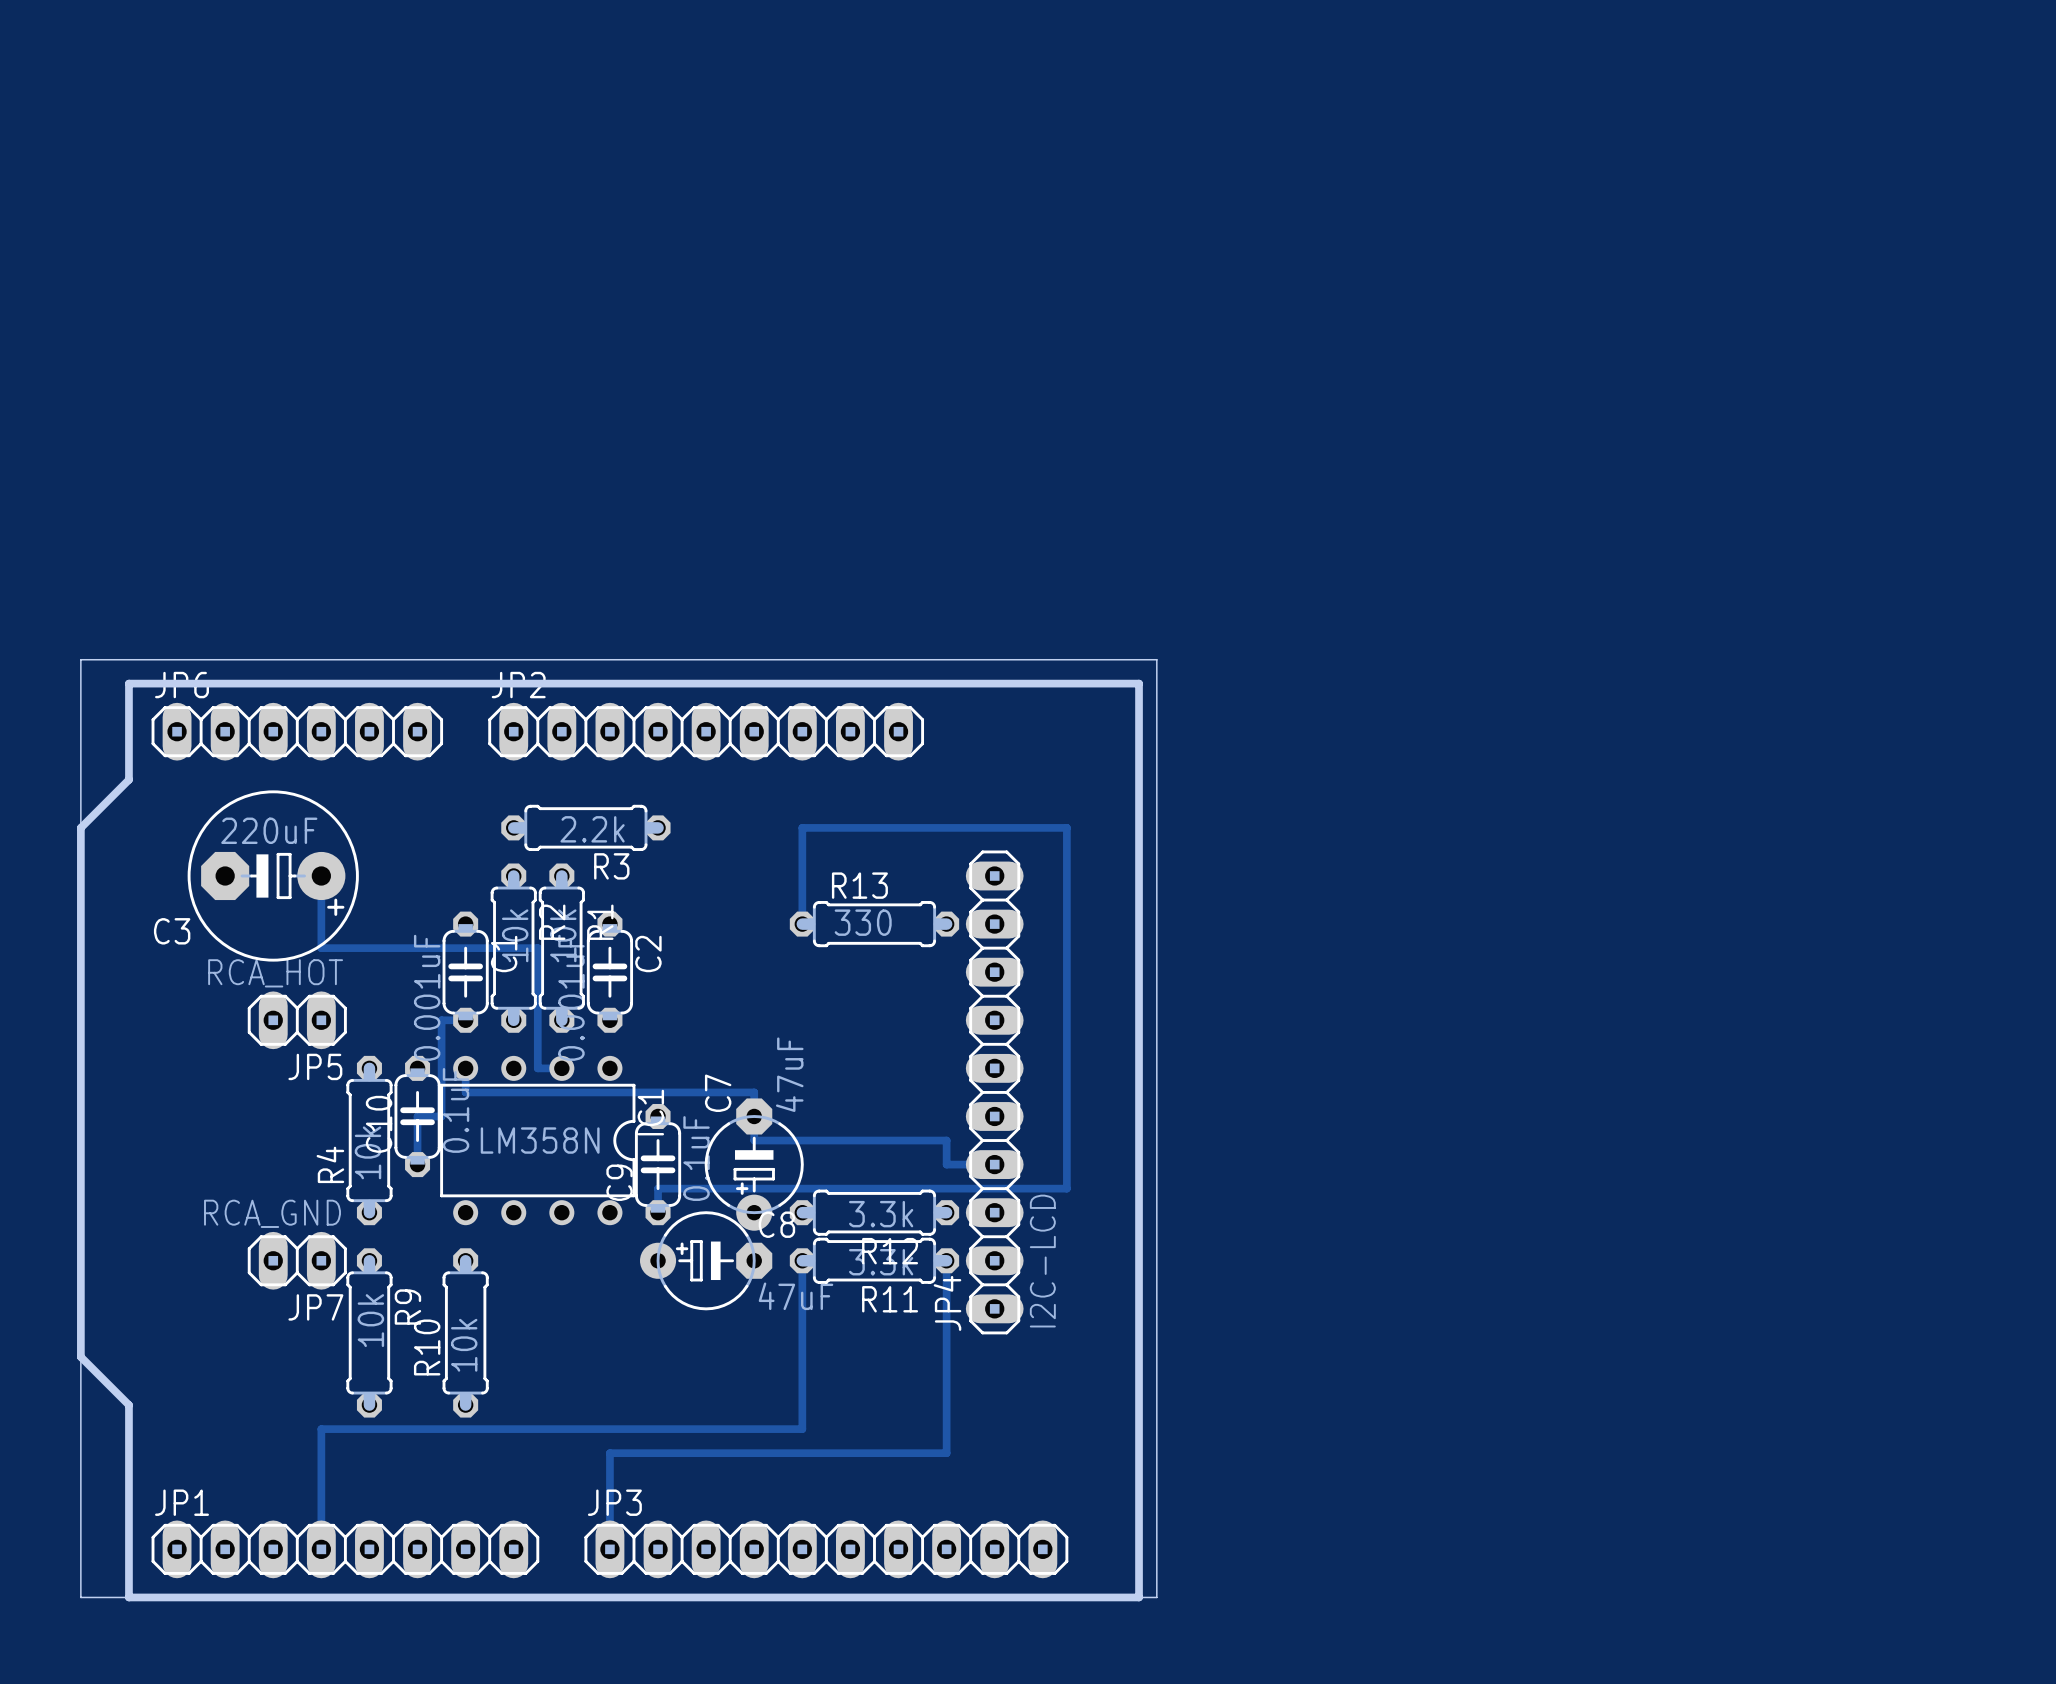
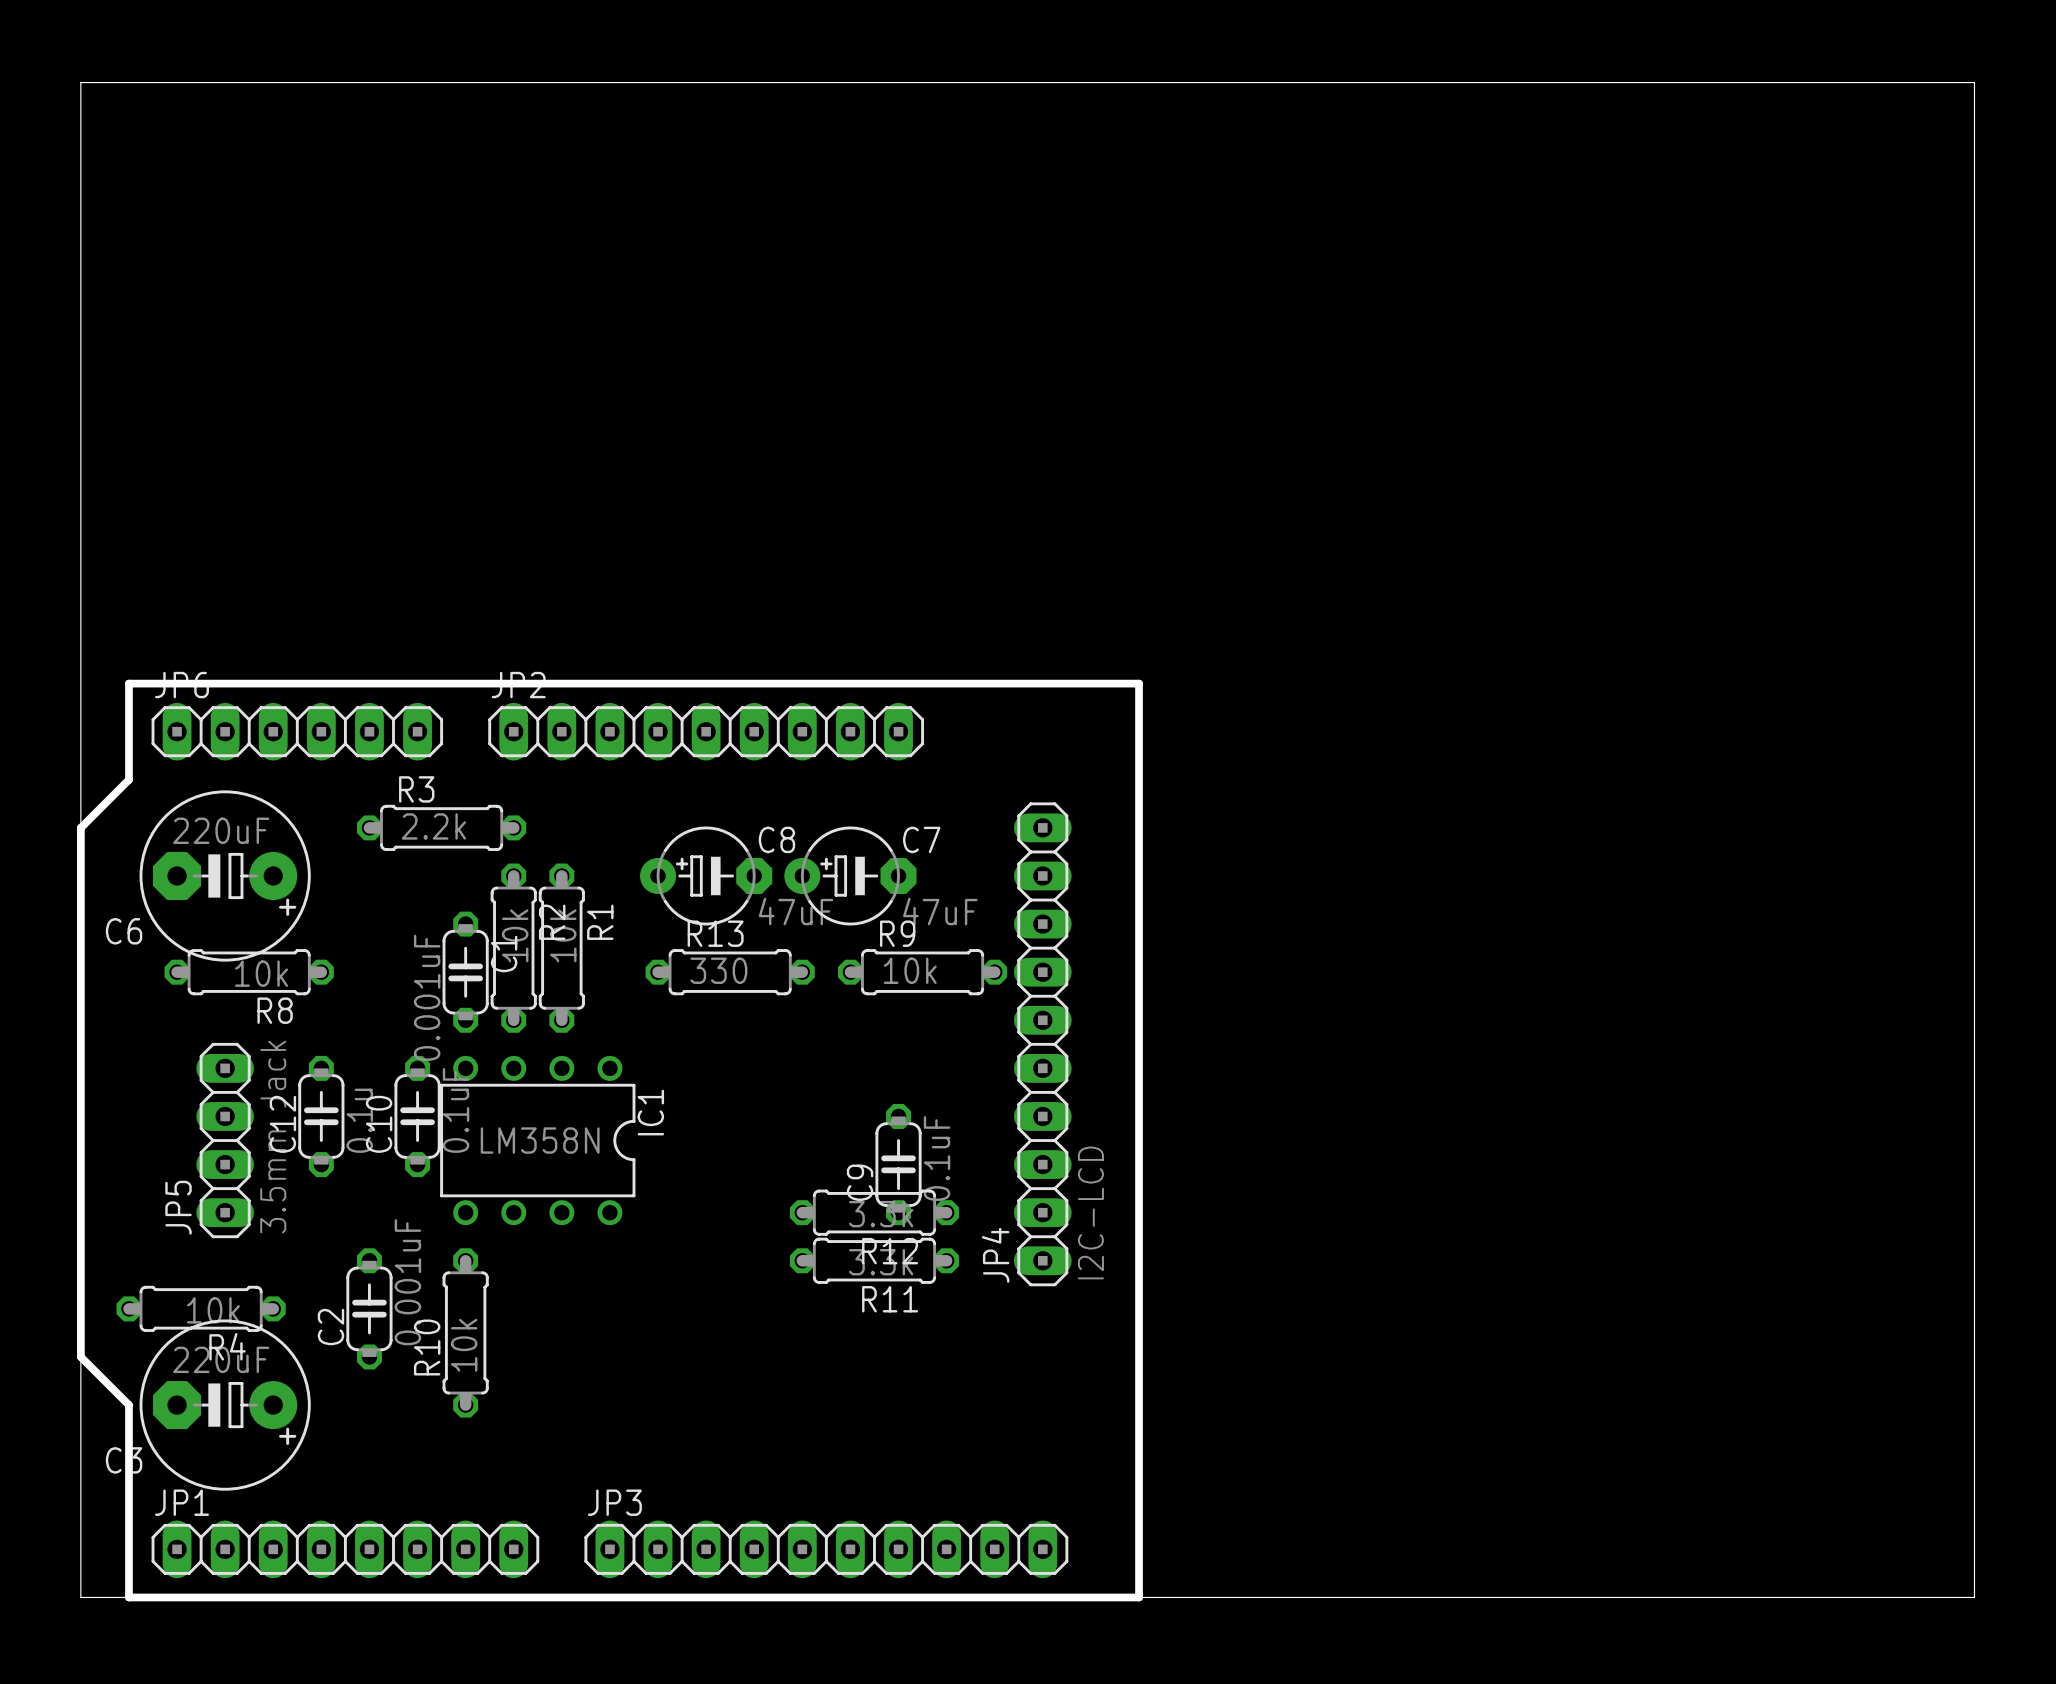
board edge: (80, 659) (1156, 659) (1156, 1597) -> (80, 659) (80, 82) (1974, 82) (1974, 1597) (1156, 1597)
R3 position: (585, 827) -> (441, 827)
R3 value position: 2.2k (592, 829) -> 2.2k (433, 826)
R3 name position: R3 (611, 866) -> R3 (416, 789)
C6: none -> 220uF (225, 875)
C3 position: (273, 875) -> (225, 1405)
track: (321, 875) (321, 948) (537, 948) (537, 1068) (561, 1068) -> none
track: (802, 924) (802, 827) (1066, 827) (1066, 1188) (658, 1188) (658, 1212) -> none
R13 position: (874, 924) -> (730, 972)
R8: none -> 10k (249, 972)
C2 rotation: 0° (609, 972) -> 180° (369, 1308)
C2 position: (609, 972) -> (369, 1308)
JP5 value: RCA_HOT (275, 973) -> 3.5mm Jack (273, 1137)
JP5 footprint: [247, 991, 347, 1050] -> [196, 1042, 255, 1239]
track: (465, 1020) (441, 1020) (441, 1116) (417, 1116) (417, 1164) -> none
JP5 name position: JP5 (315, 1066) -> JP5 (178, 1207)
track: (465, 1068) (465, 1092) (754, 1092) (754, 1140) (946, 1140) (946, 1164) (994, 1164) -> none
JP4 position: (994, 1092) -> (1042, 1044)
C12: none -> 0.1u (321, 1116)
R4 rotation: 0° (369, 1140) -> 90° clockwise (201, 1308)
R4 position: (369, 1140) -> (201, 1308)
R4 name position: R4 (330, 1164) -> R4 (227, 1346)
C9 position: (658, 1164) -> (898, 1164)
C7 rotation: 0° (754, 1164) -> 90° clockwise (850, 875)
C7 position: (754, 1164) -> (850, 875)
JP7: RCA_GND (297, 1260) -> none
C8 position: (706, 1260) -> (706, 875)
track: (802, 1260) (802, 1429) (321, 1429) (321, 1549) -> none
track: (946, 1260) (946, 1453) (609, 1453) (609, 1549) -> none
R9 name position: R9 (407, 1307) -> R9 (897, 933)
R9 rotation: 0° (369, 1332) -> 90° clockwise (922, 972)
R9 position: (369, 1332) -> (922, 972)

